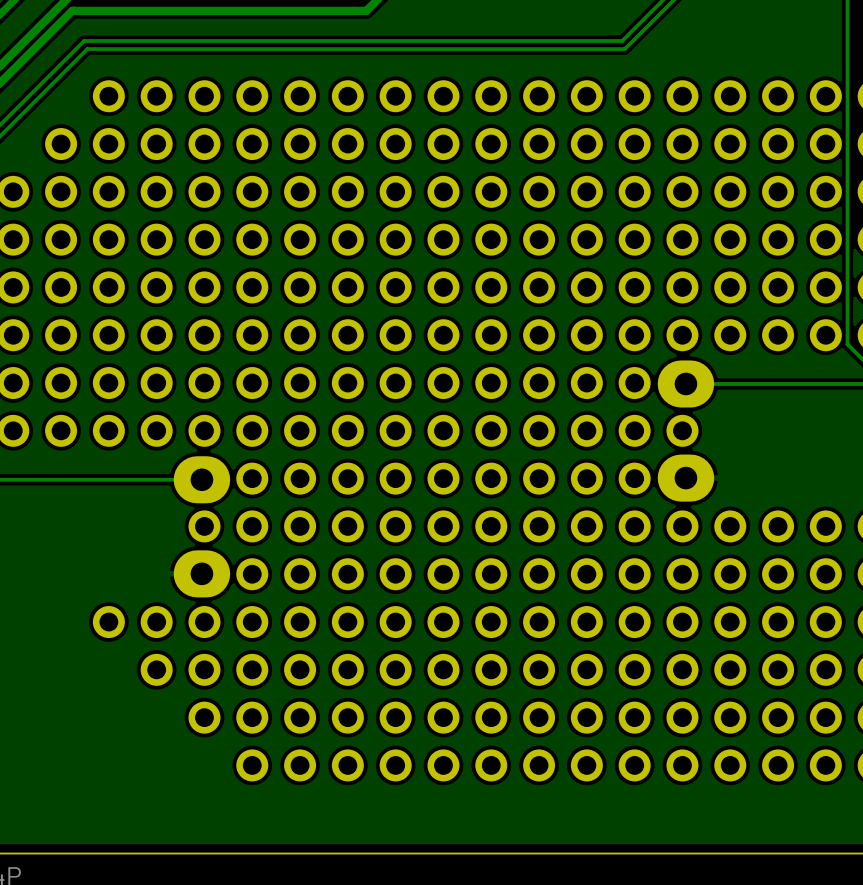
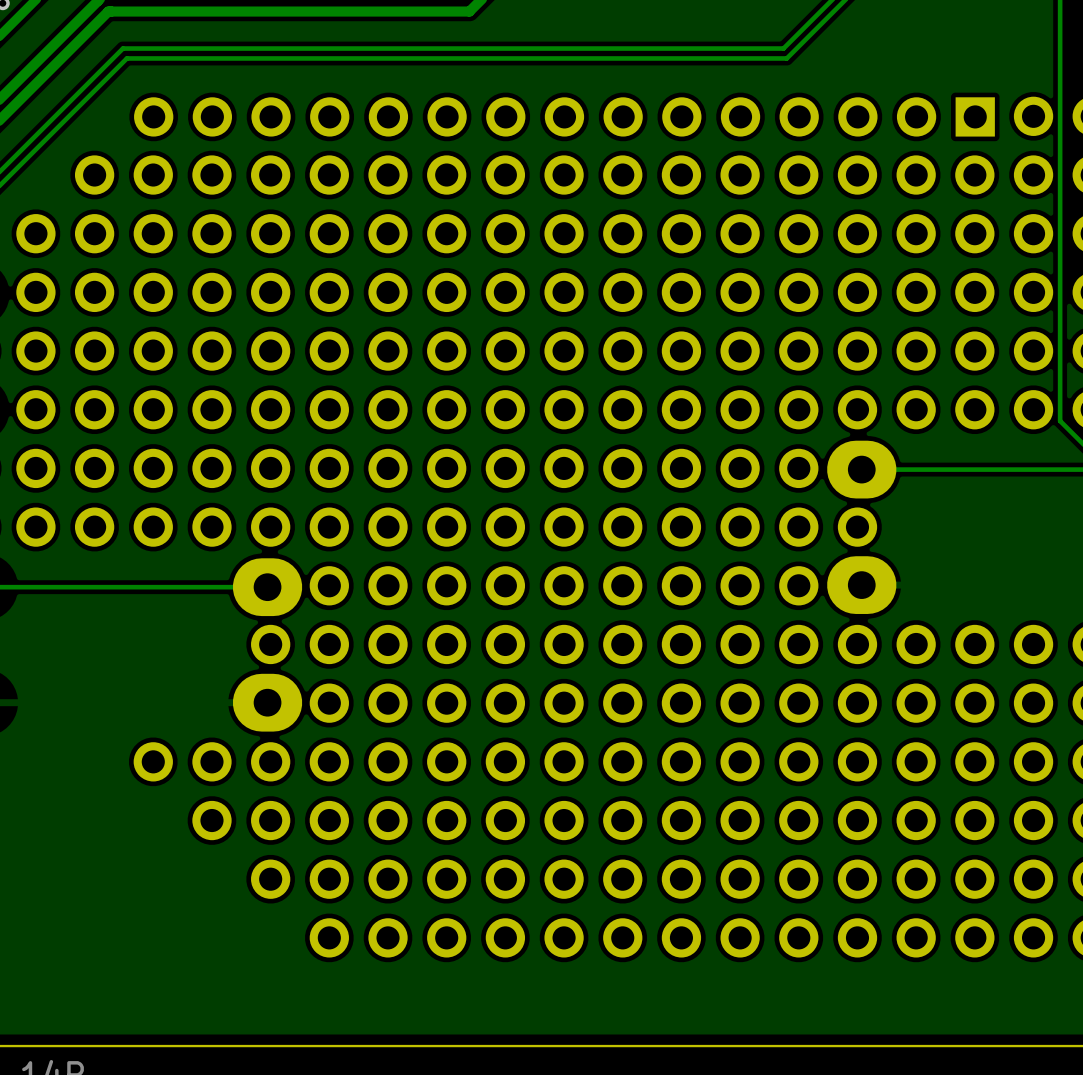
part footprint: [427, 80, 460, 113] -> [134, 97, 995, 137]
part: (108, 96) -> none
part: (156, 96) -> none
part: (204, 96) -> none
part: (252, 96) -> none
part: (300, 96) -> none
part: (347, 96) -> none
part: (395, 96) -> none
part: (491, 96) -> none
part: (539, 96) -> none
part: (586, 96) -> none
part: (634, 96) -> none
part: (682, 96) -> none
part: (730, 96) -> none
part: (778, 96) -> none

